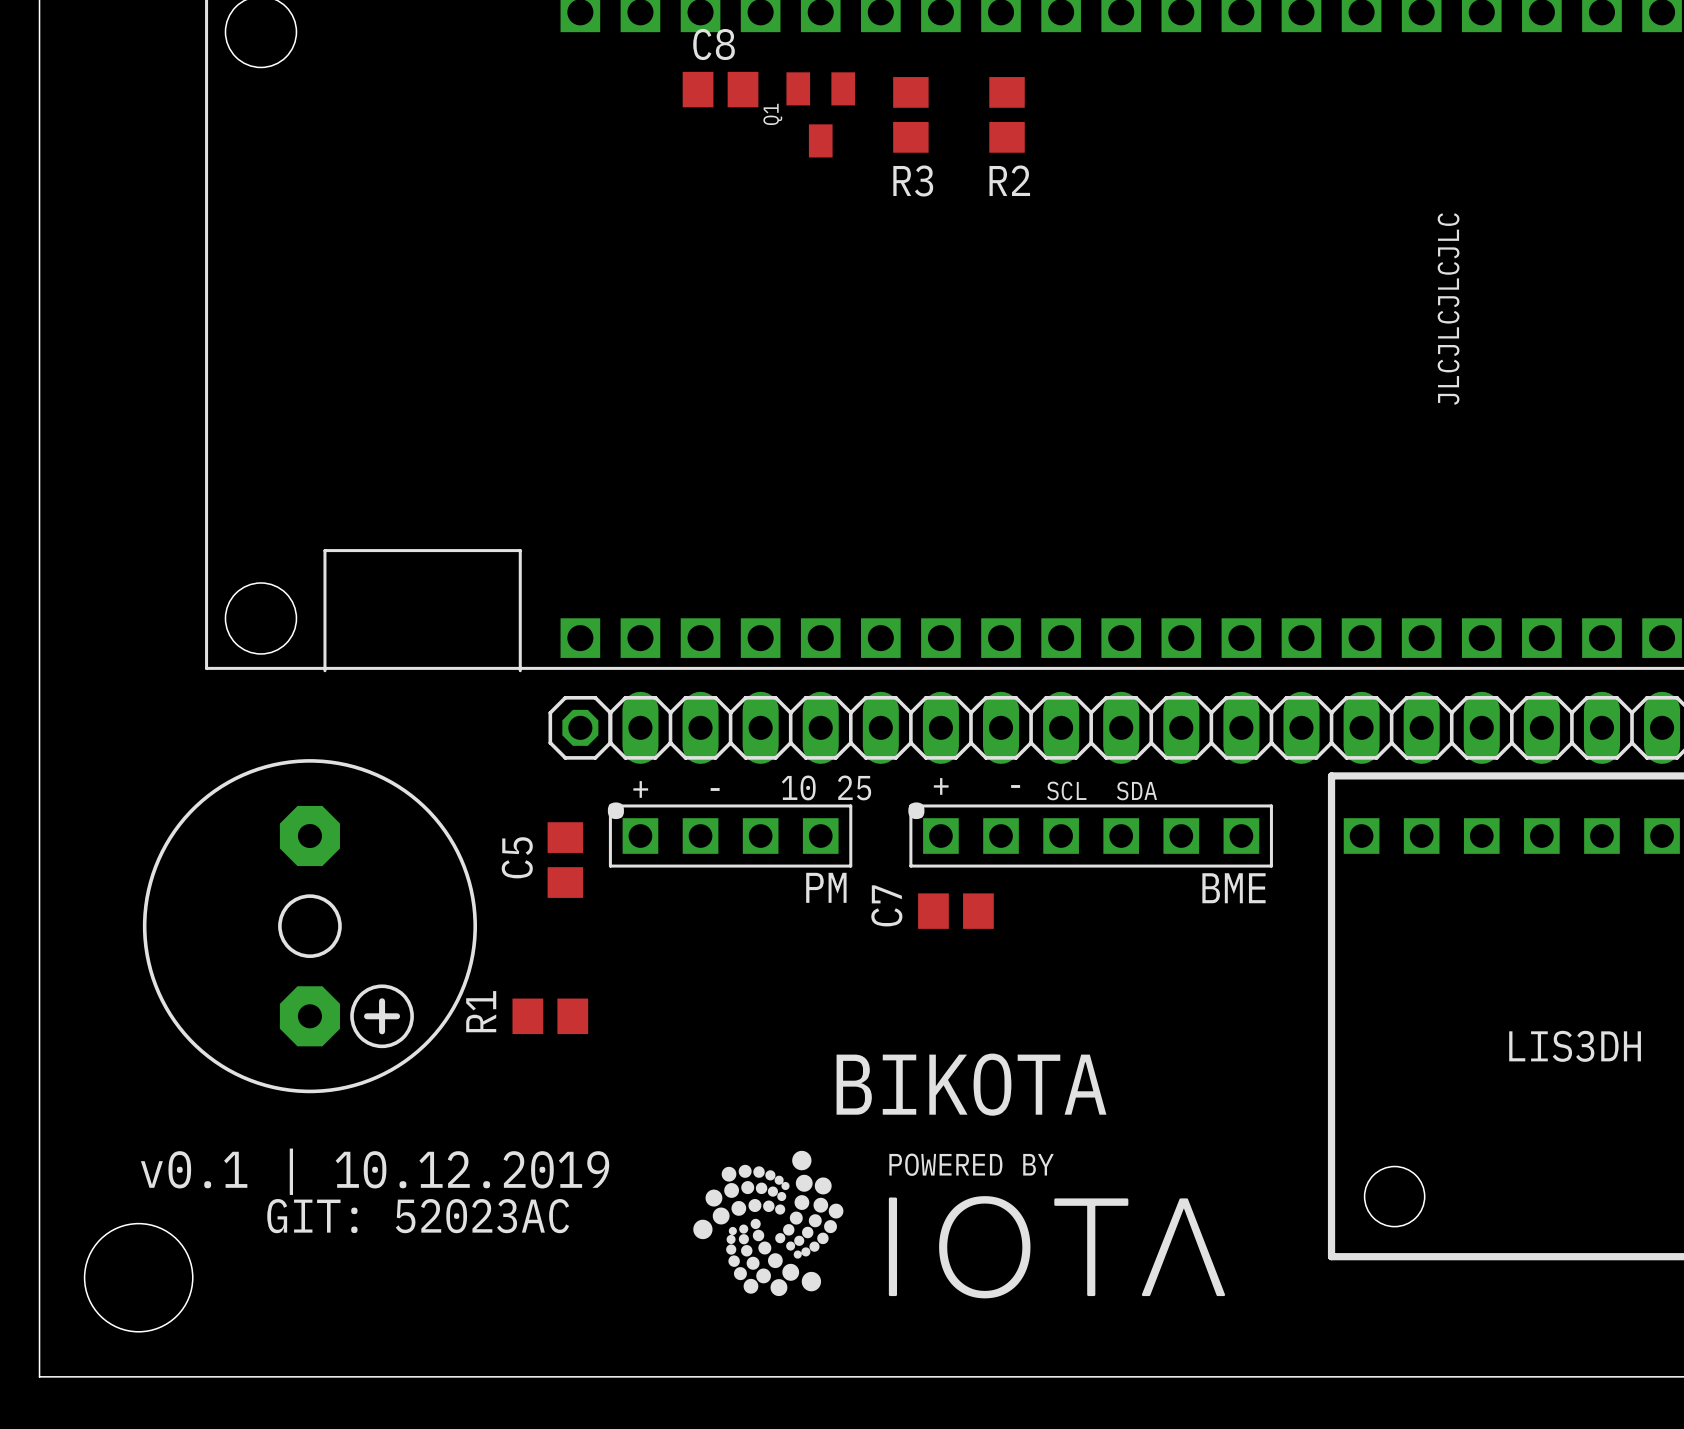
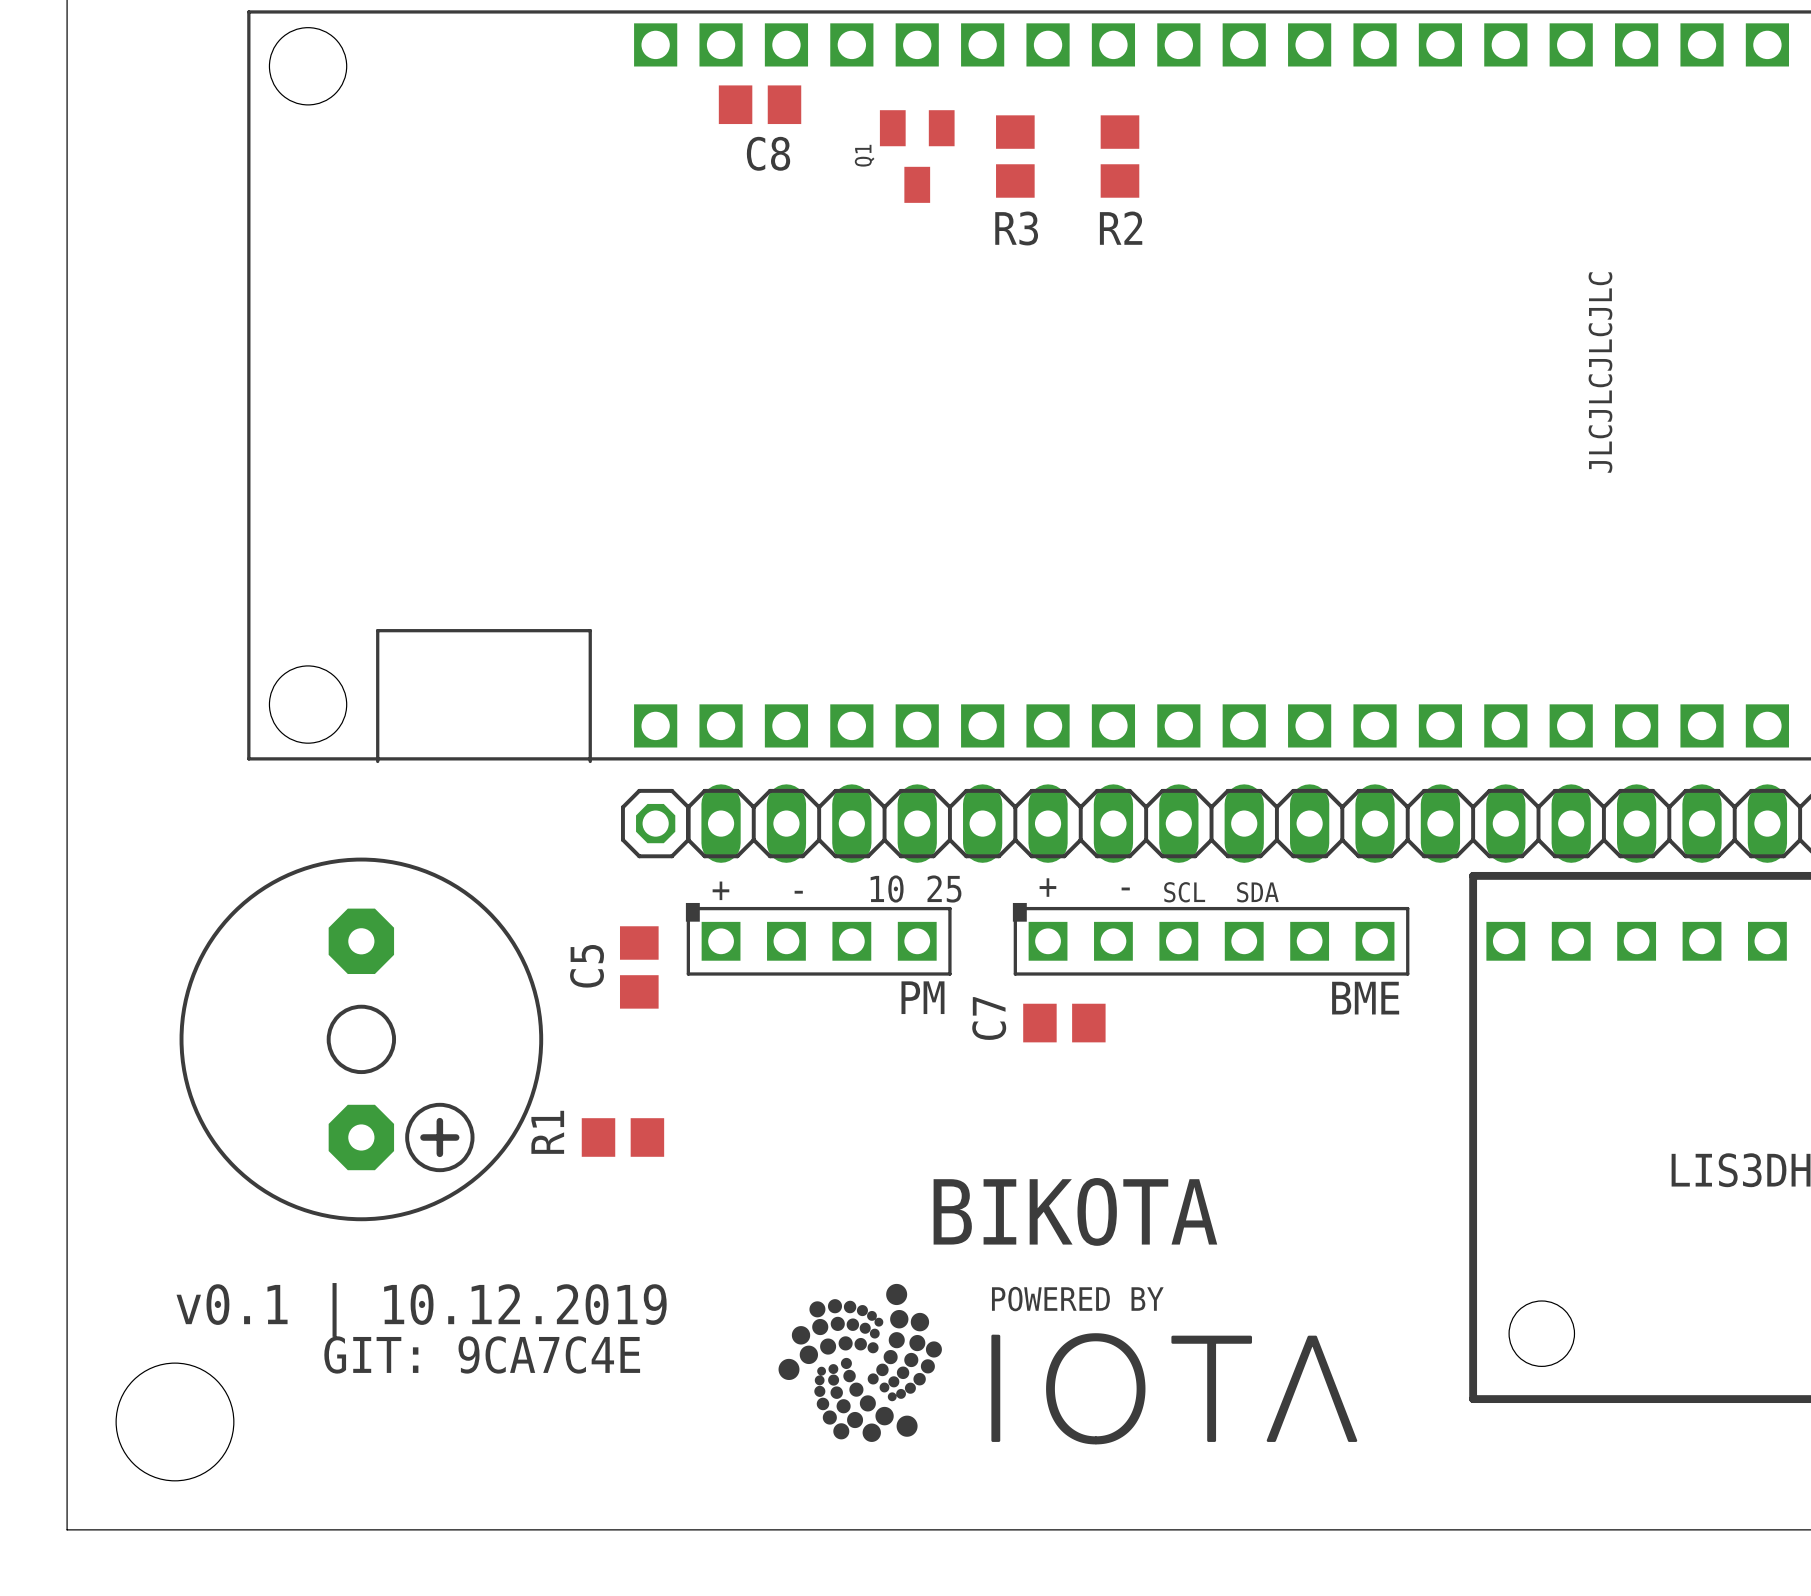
C8 name position: C8 (714, 44) -> C8 (768, 153)
C8 position: (720, 89) -> (760, 104)
text: GIT: 52023AC (418, 1216) -> GIT: 9CA7C4E (482, 1354)

